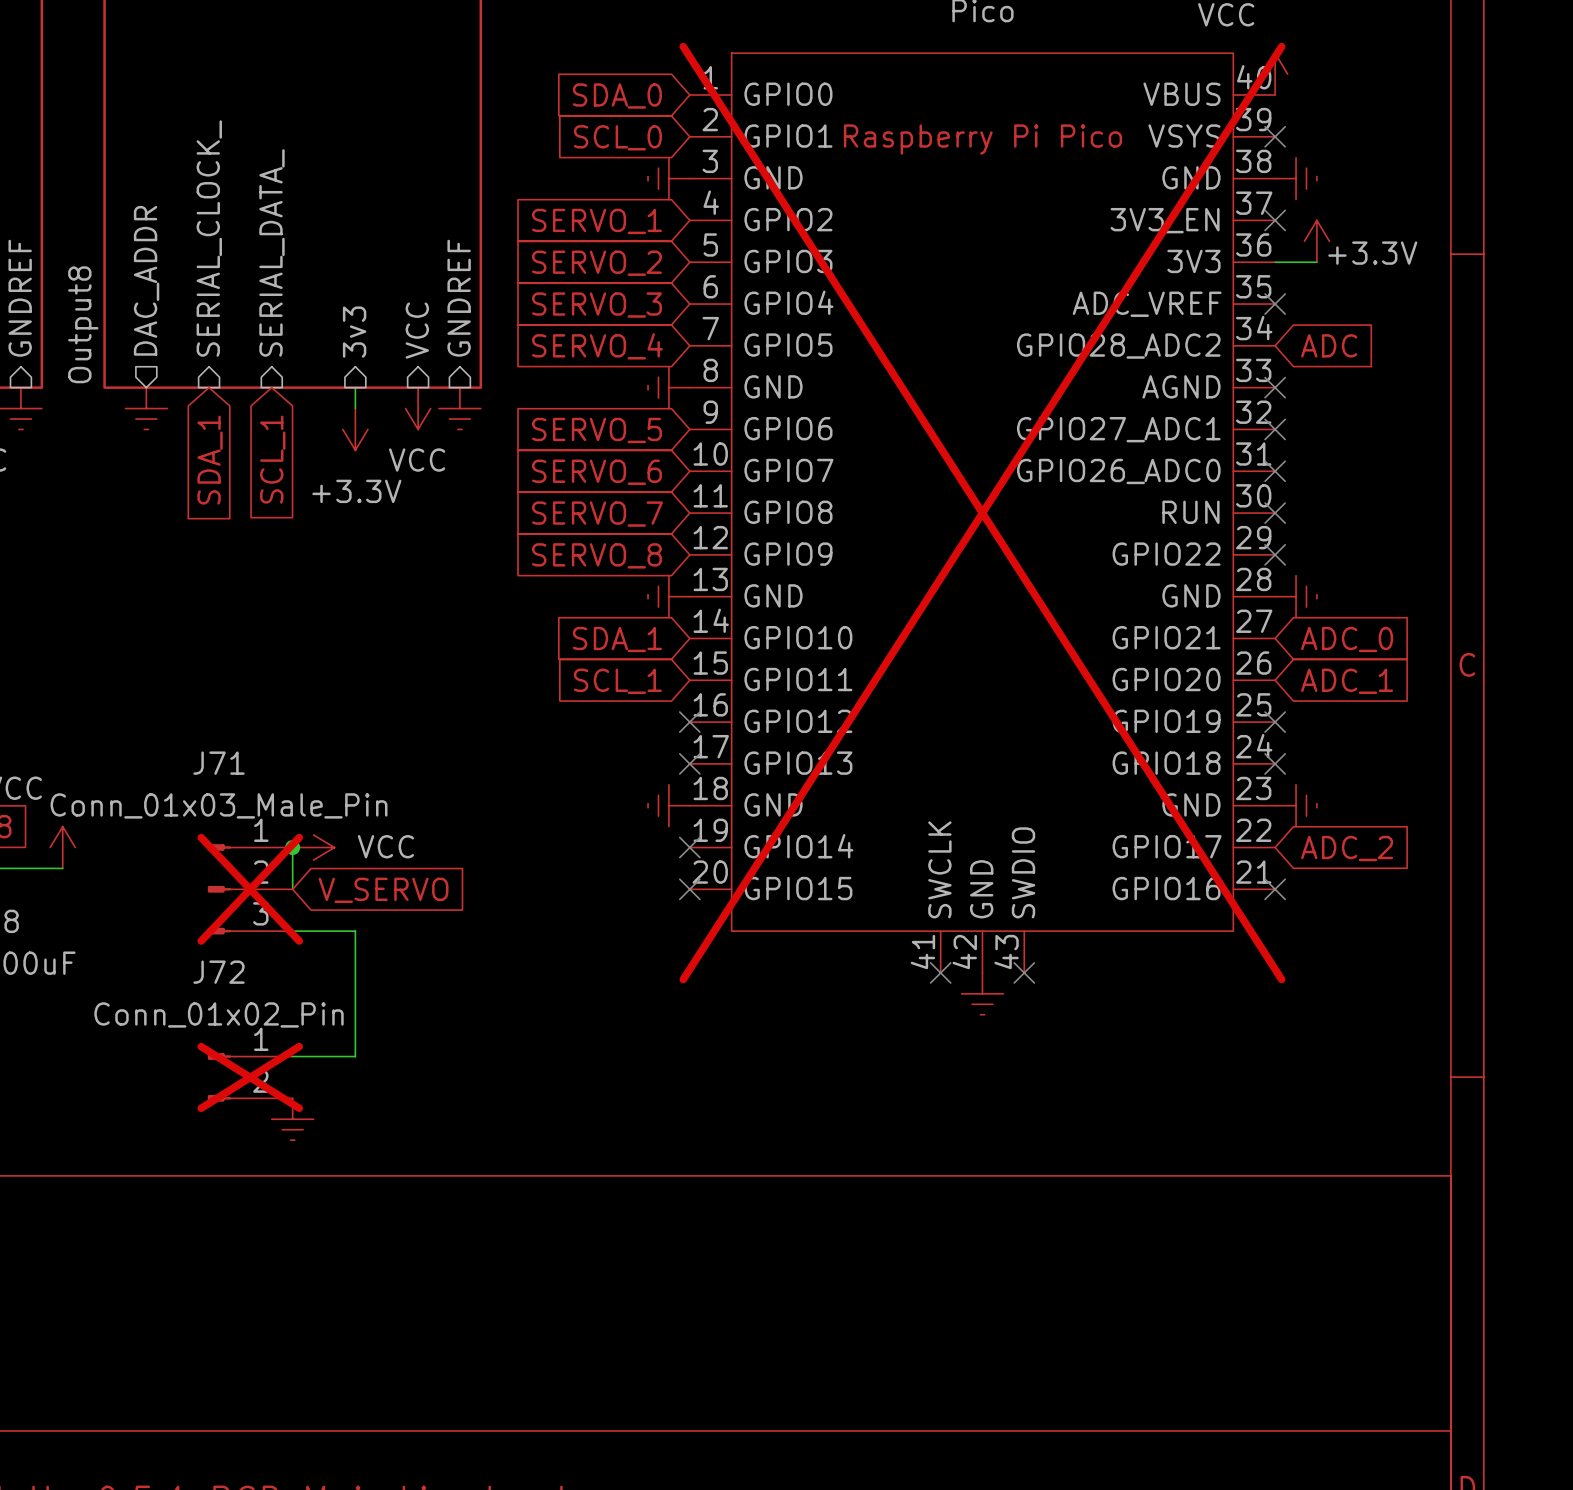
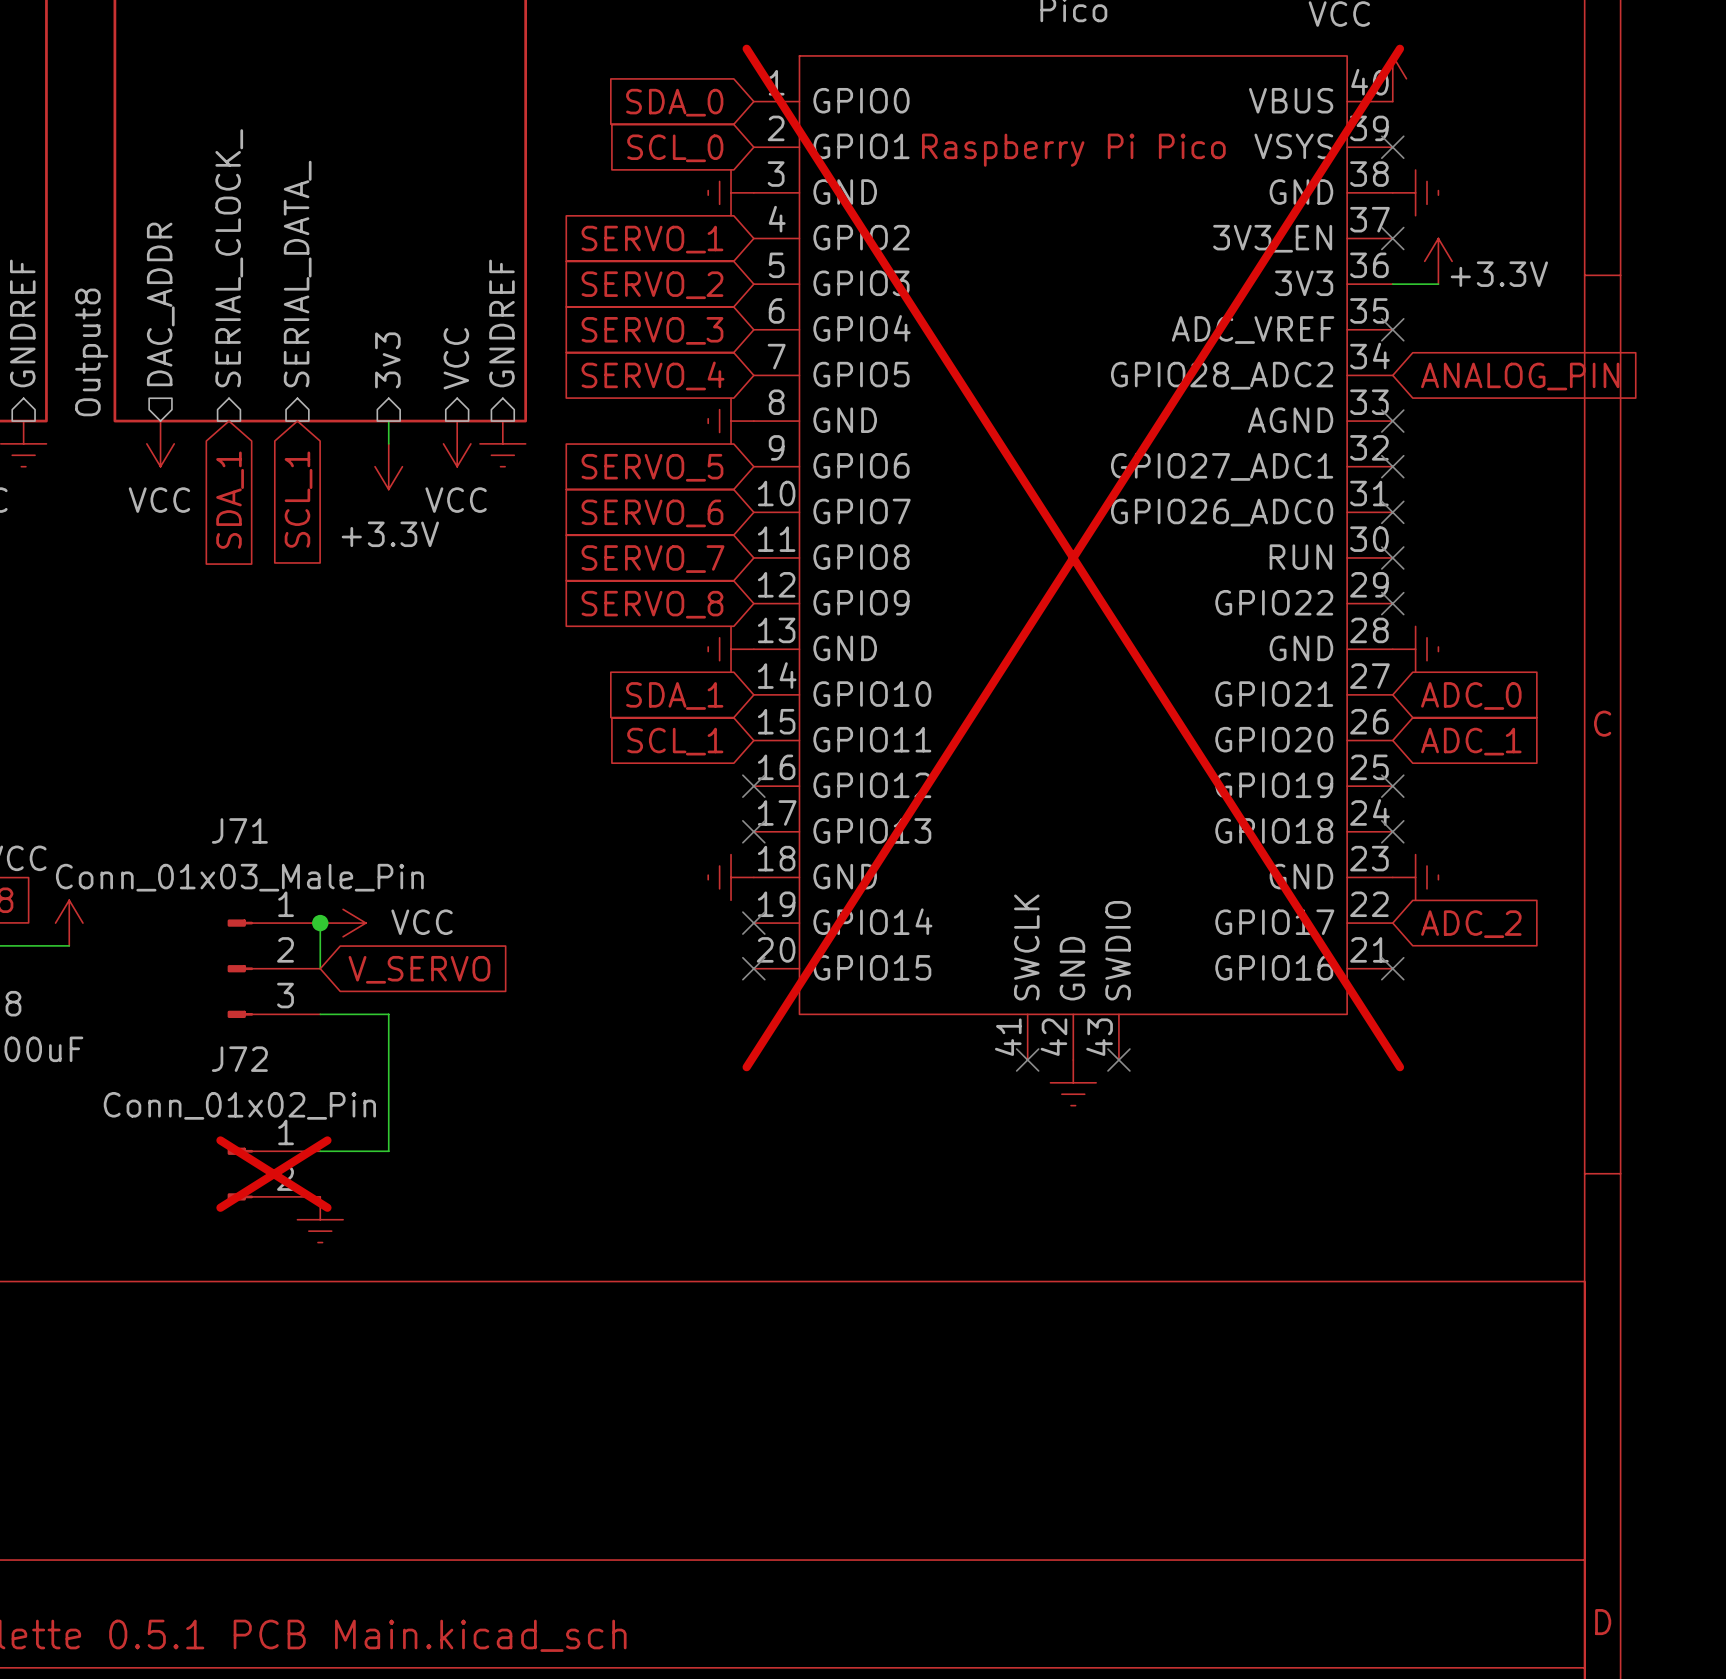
global label: ADC (1329, 345) -> ANALOG_PIN (1520, 376)
power symbol shape: [125, 387, 168, 430] -> [146, 421, 175, 467]
power symbol text: none -> VCC (159, 500)
J71 do-not-place cross: (250, 889) -> none

